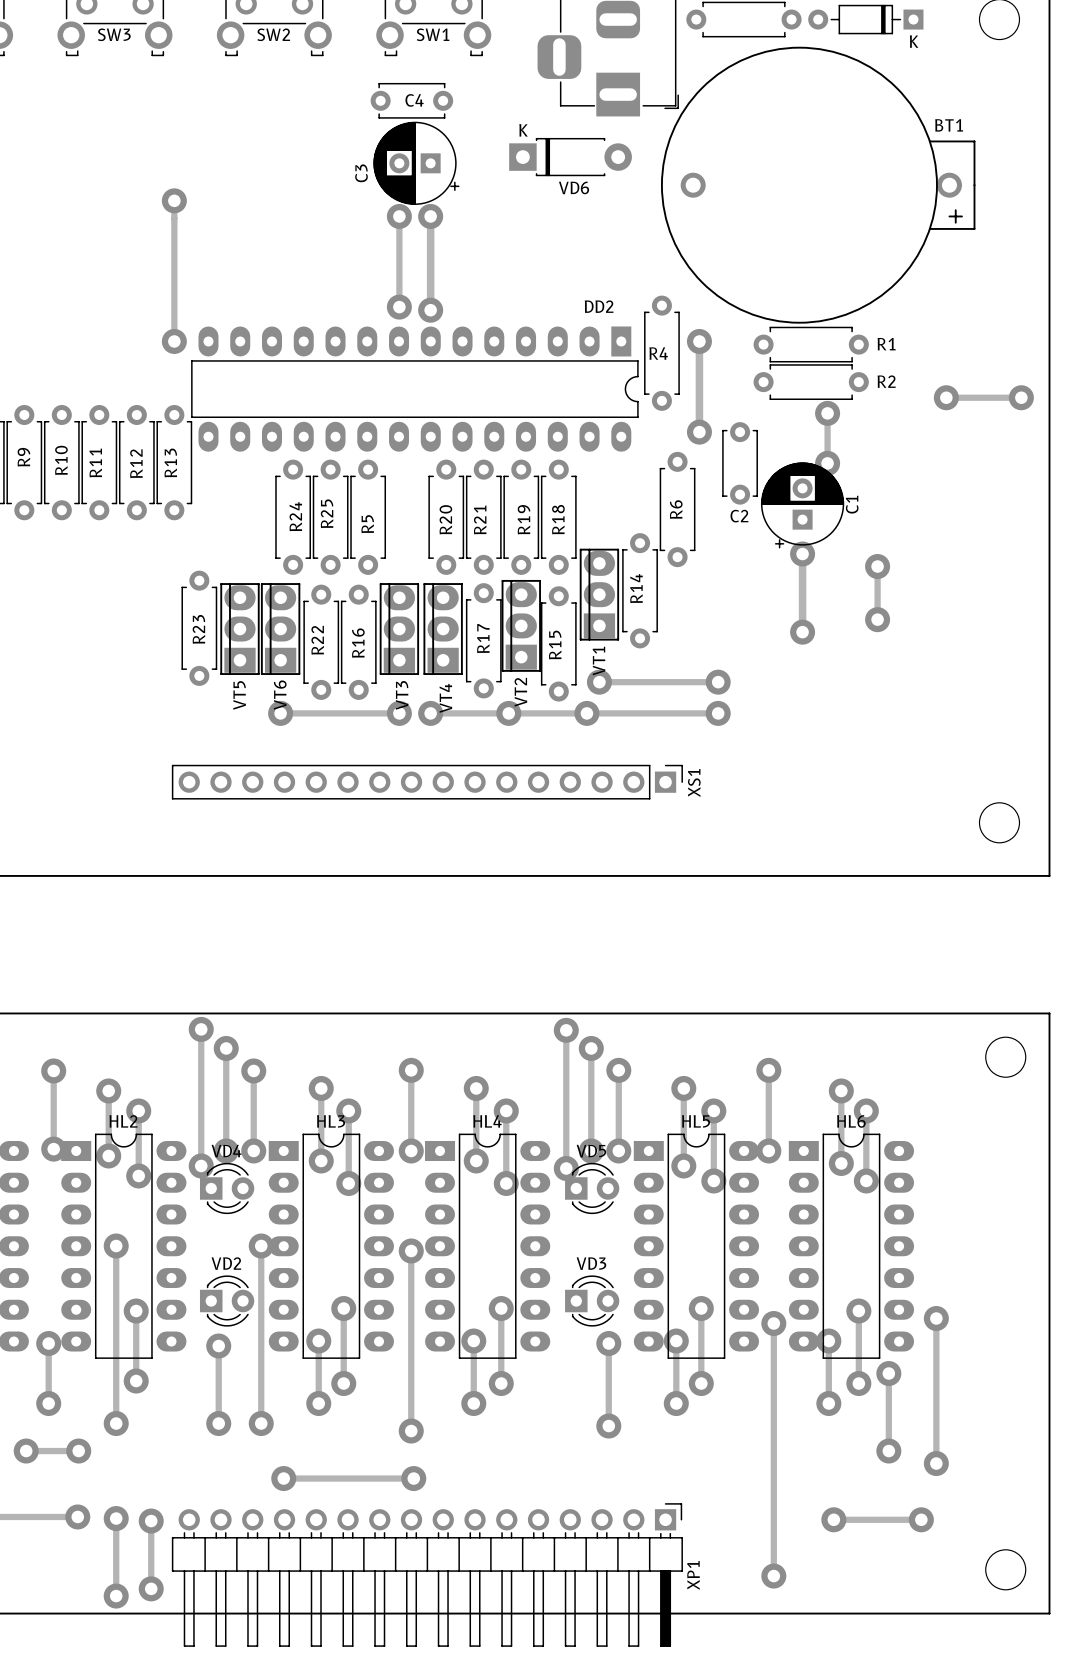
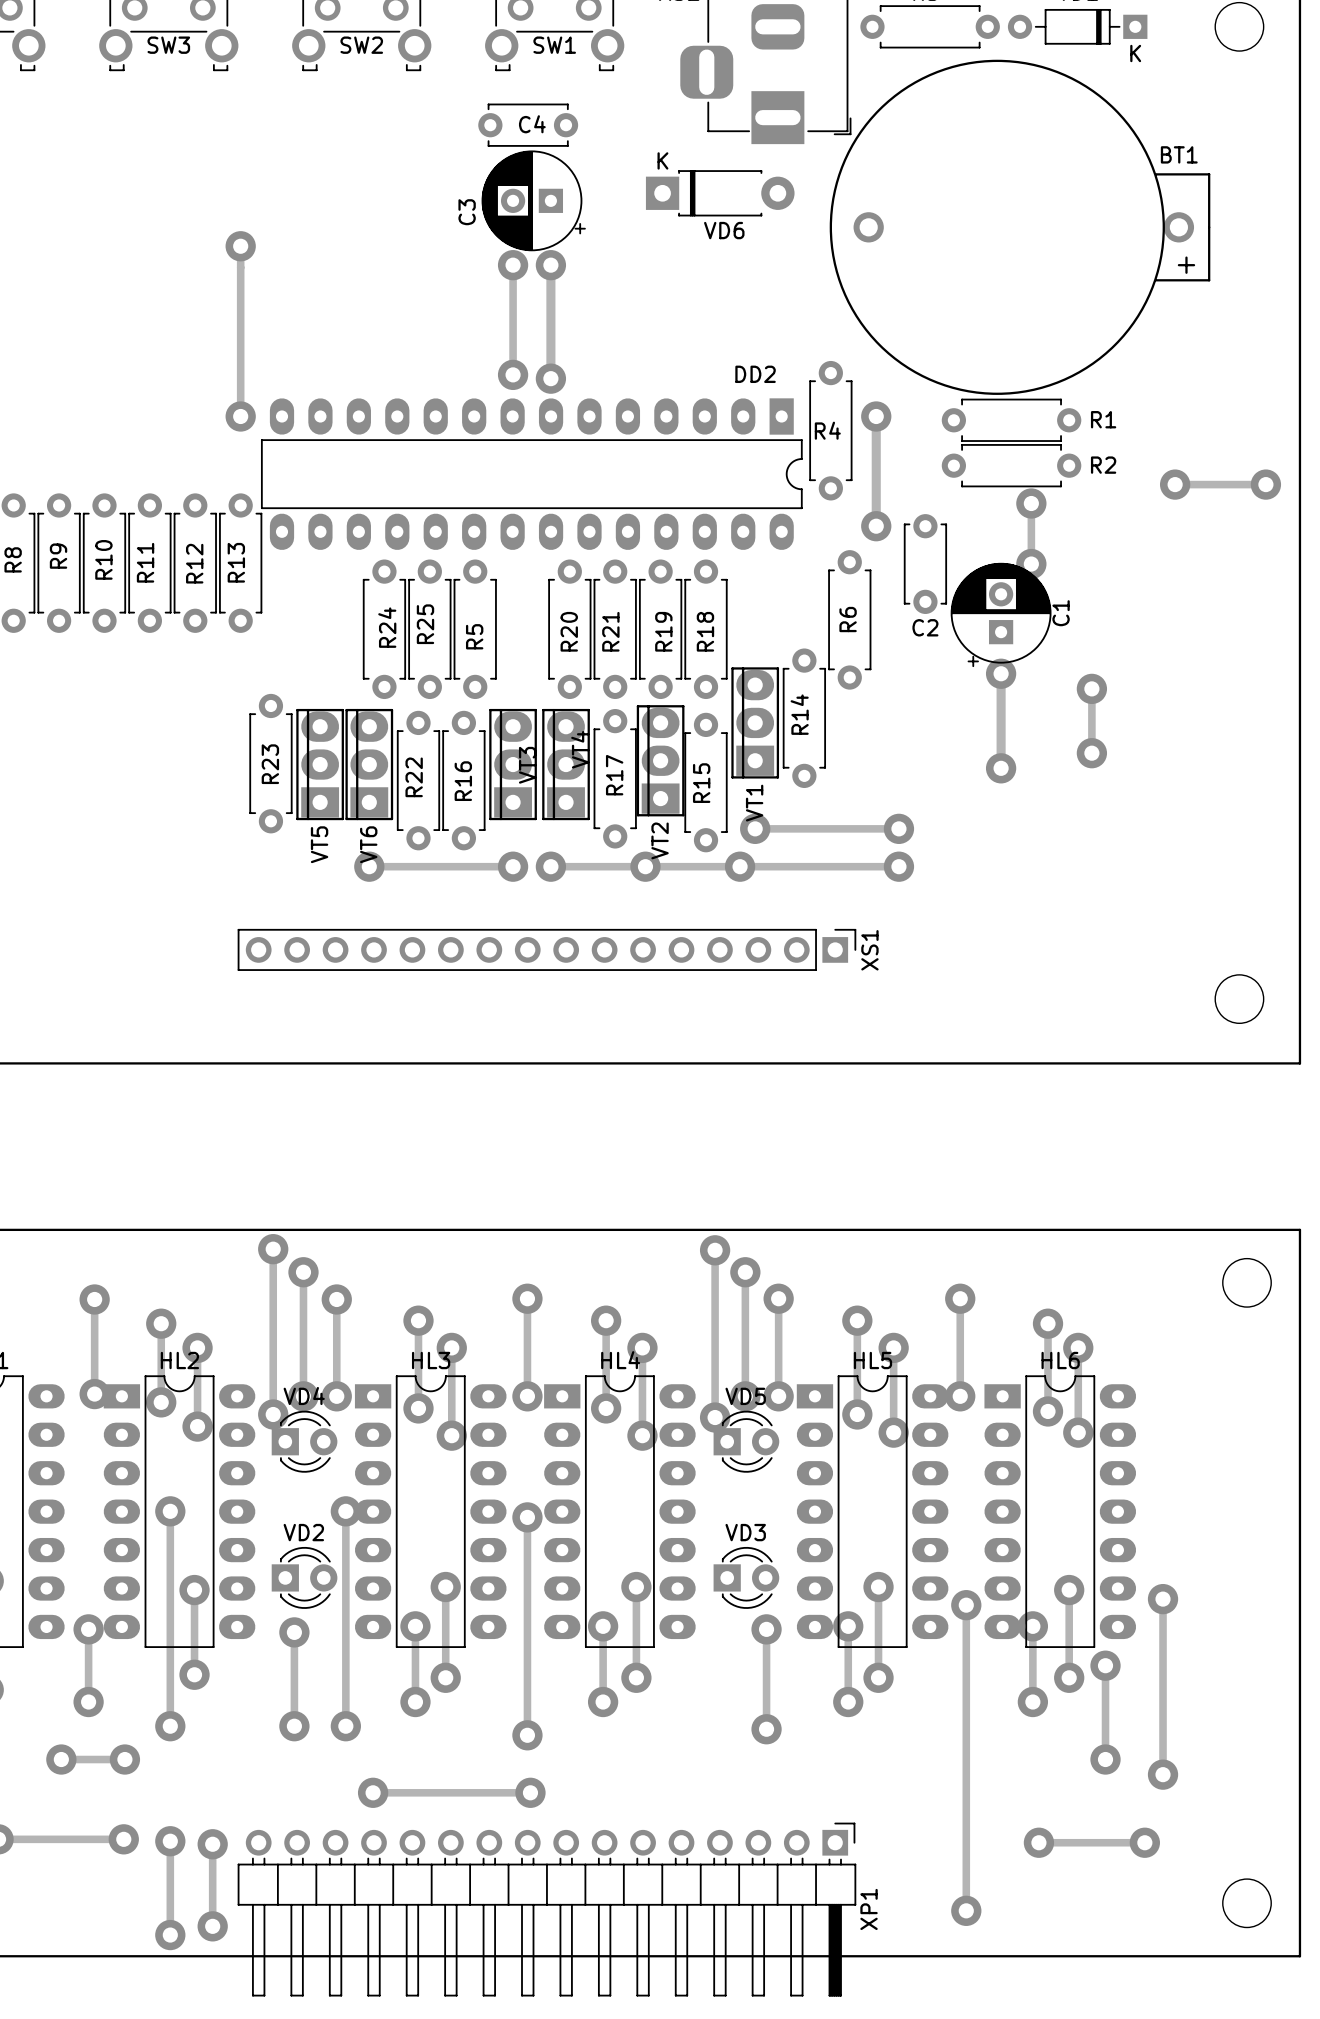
VT3 name position: VT3 (402, 695) -> VT3 (527, 765)
VT4 name position: VT4 (445, 698) -> VT4 (580, 749)

